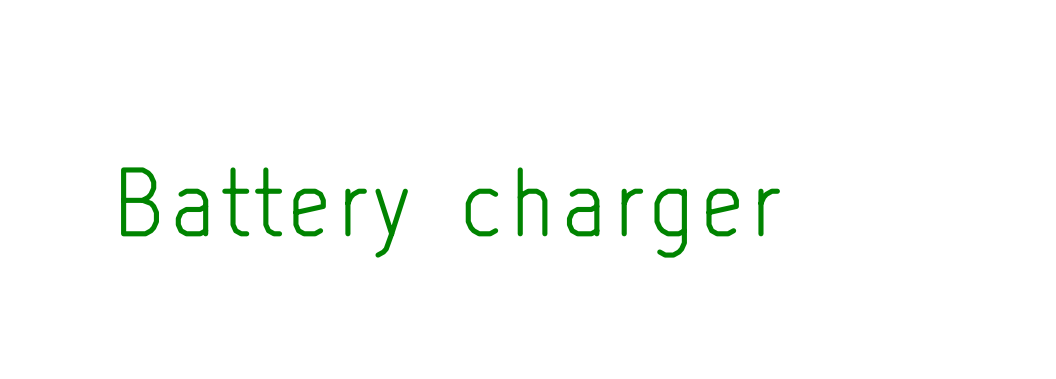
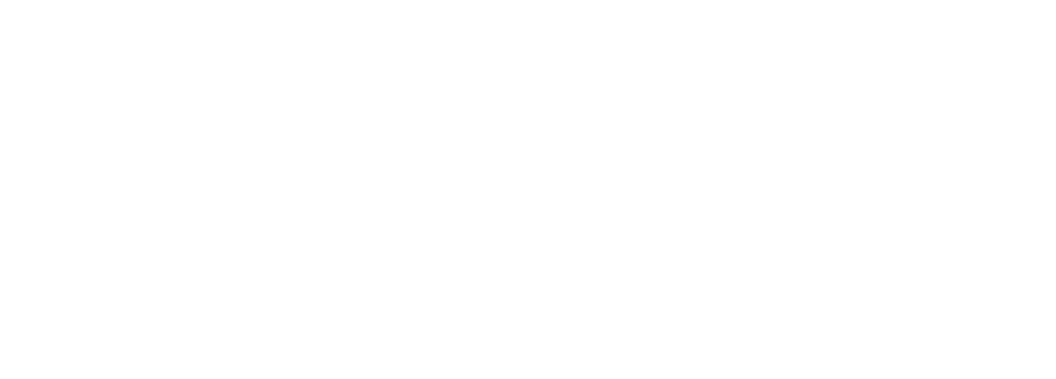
text: Battery charger (450, 212) -> none

